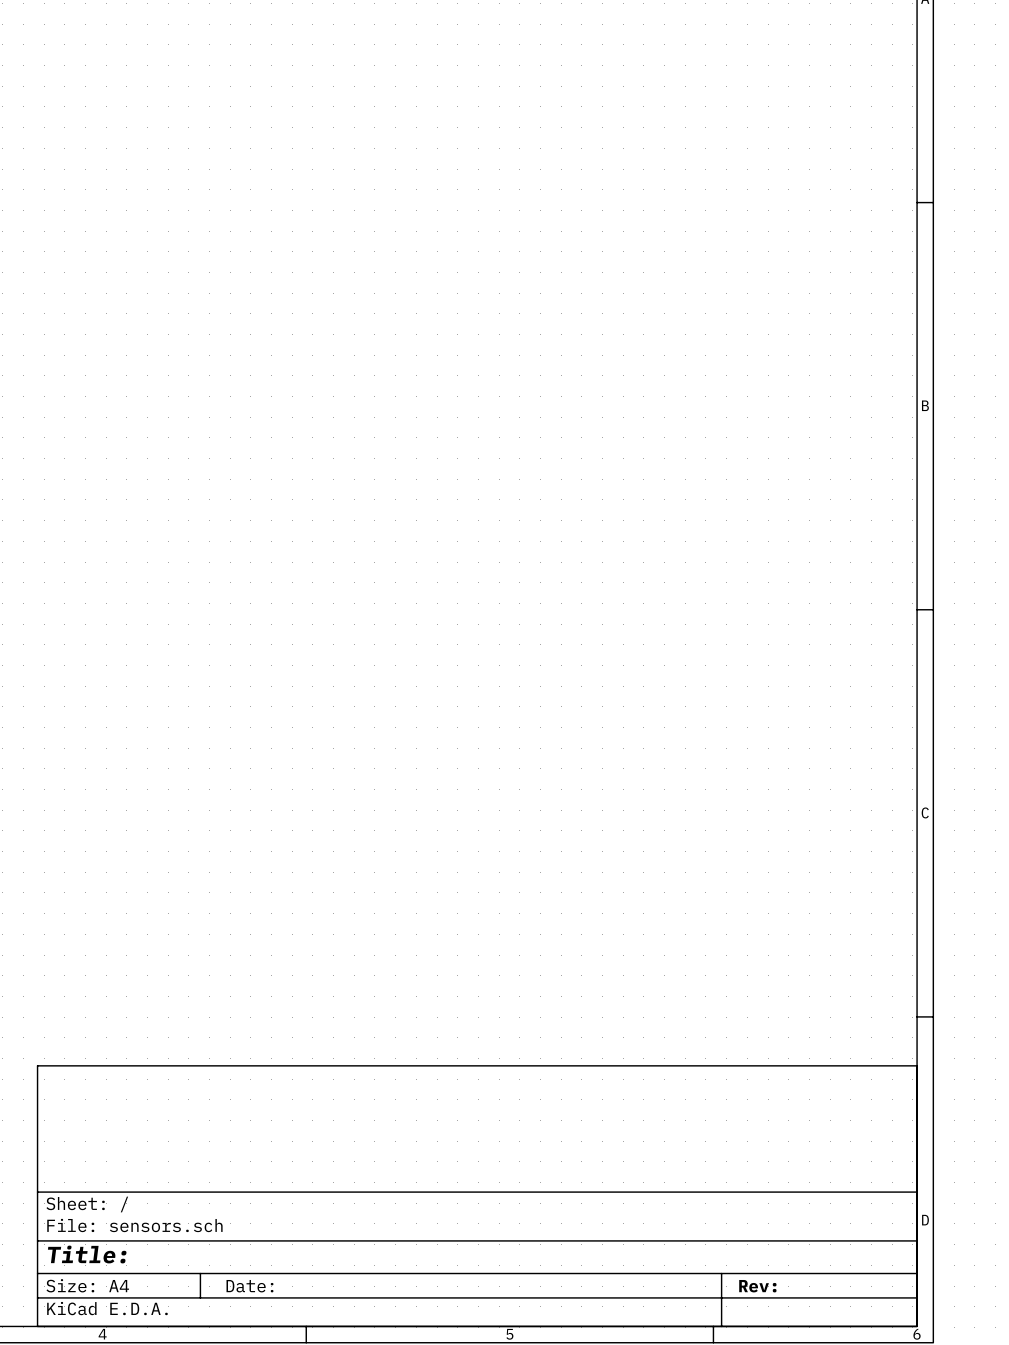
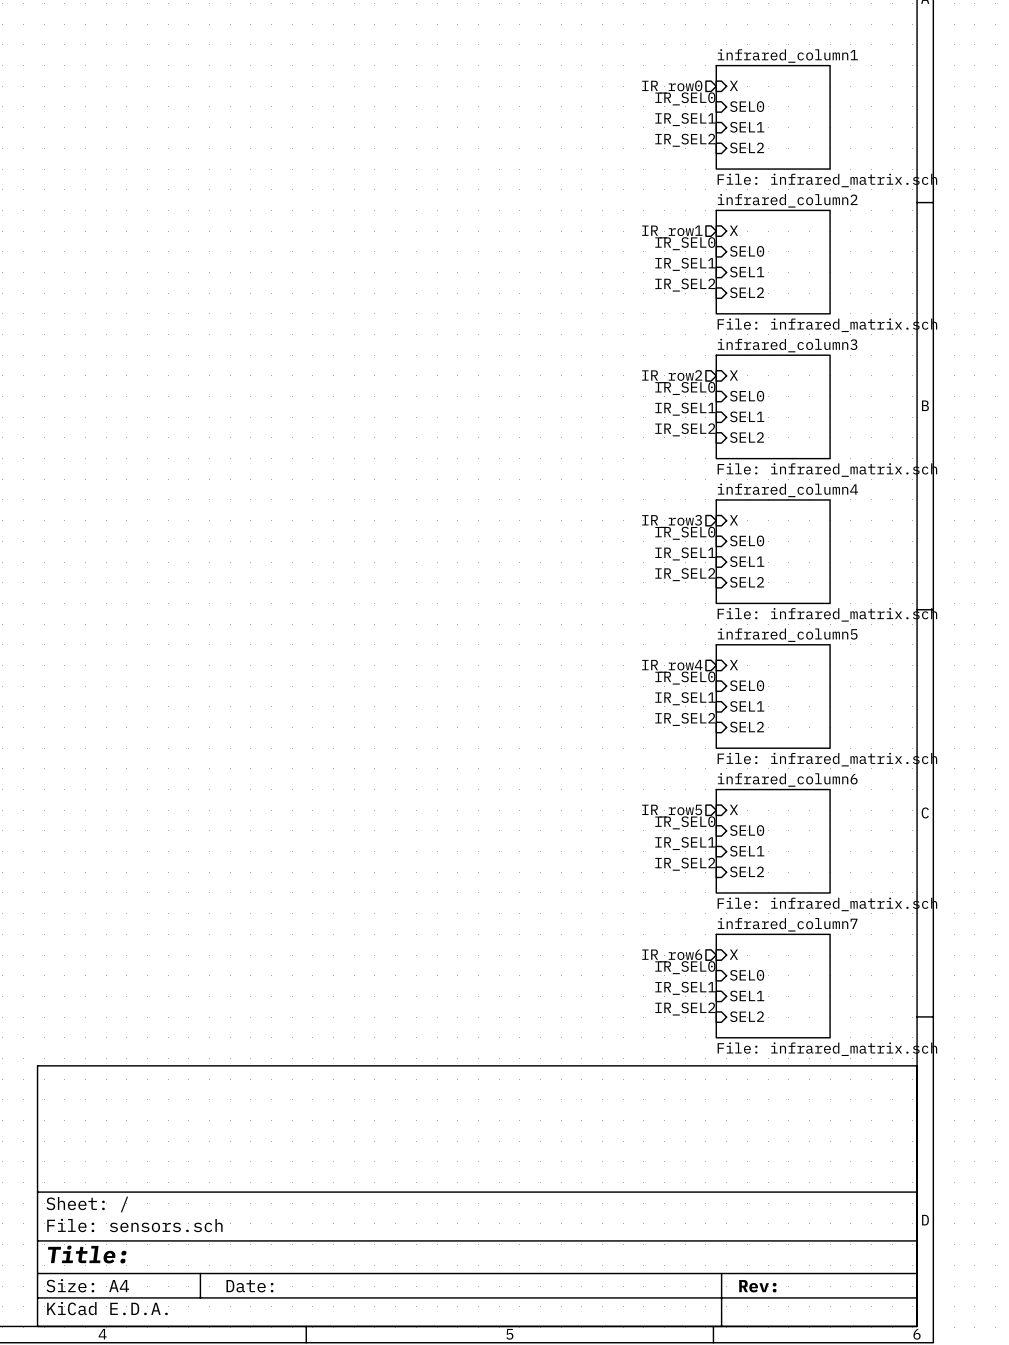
sheet pin: none -> X (733, 85)
hierarchical label: none -> IR_row0 (672, 87)
label: none -> IR_SEL0 (685, 98)
sheet pin: none -> SEL0 (747, 106)
sheet infrared_column1: none -> File: infrared_matrix.sch (773, 117)
label: none -> IR_SEL1 (685, 119)
sheet pin: none -> SEL1 (747, 127)
label: none -> IR_SEL2 (685, 140)
sheet pin: none -> SEL2 (747, 147)
sheet pin: none -> X (733, 230)
hierarchical label: none -> IR_row1 (672, 231)
label: none -> IR_SEL0 (685, 243)
sheet pin: none -> SEL0 (747, 251)
sheet infrared_column2: none -> File: infrared_matrix.sch (773, 262)
label: none -> IR_SEL1 (685, 264)
sheet pin: none -> SEL1 (747, 272)
label: none -> IR_SEL2 (685, 285)
sheet pin: none -> SEL2 (747, 292)
sheet pin: none -> X (733, 375)
hierarchical label: none -> IR_row2 (672, 376)
label: none -> IR_SEL0 (685, 388)
sheet pin: none -> SEL0 (747, 396)
sheet infrared_column3: none -> File: infrared_matrix.sch (773, 406)
label: none -> IR_SEL1 (685, 409)
sheet pin: none -> SEL1 (747, 416)
label: none -> IR_SEL2 (685, 429)
sheet pin: none -> SEL2 (747, 437)
sheet pin: none -> X (733, 520)
hierarchical label: none -> IR_row3 (672, 521)
label: none -> IR_SEL0 (685, 533)
sheet pin: none -> SEL0 (747, 540)
sheet infrared_column4: none -> File: infrared_matrix.sch (773, 551)
label: none -> IR_SEL1 (685, 553)
sheet pin: none -> SEL1 (747, 561)
label: none -> IR_SEL2 (685, 574)
sheet pin: none -> SEL2 (747, 582)
sheet pin: none -> X (733, 665)
hierarchical label: none -> IR_row4 (672, 666)
label: none -> IR_SEL0 (685, 678)
sheet pin: none -> SEL0 (747, 685)
sheet infrared_column5: none -> File: infrared_matrix.sch (773, 696)
label: none -> IR_SEL1 (685, 698)
sheet pin: none -> SEL1 (747, 706)
label: none -> IR_SEL2 (685, 719)
sheet pin: none -> SEL2 (747, 727)
sheet pin: none -> X (733, 809)
hierarchical label: none -> IR_row5 (672, 811)
label: none -> IR_SEL0 (685, 822)
sheet pin: none -> SEL0 (747, 830)
sheet infrared_column6: none -> File: infrared_matrix.sch (773, 841)
label: none -> IR_SEL1 (685, 843)
sheet pin: none -> SEL1 (747, 851)
label: none -> IR_SEL2 (685, 864)
sheet pin: none -> SEL2 (747, 871)
sheet pin: none -> X (733, 954)
hierarchical label: none -> IR_row6 (672, 955)
label: none -> IR_SEL0 (685, 967)
sheet pin: none -> SEL0 (747, 975)
sheet infrared_column7: none -> File: infrared_matrix.sch (773, 986)
label: none -> IR_SEL1 (685, 988)
sheet pin: none -> SEL1 (747, 996)
label: none -> IR_SEL2 (685, 1009)
sheet pin: none -> SEL2 (747, 1016)

